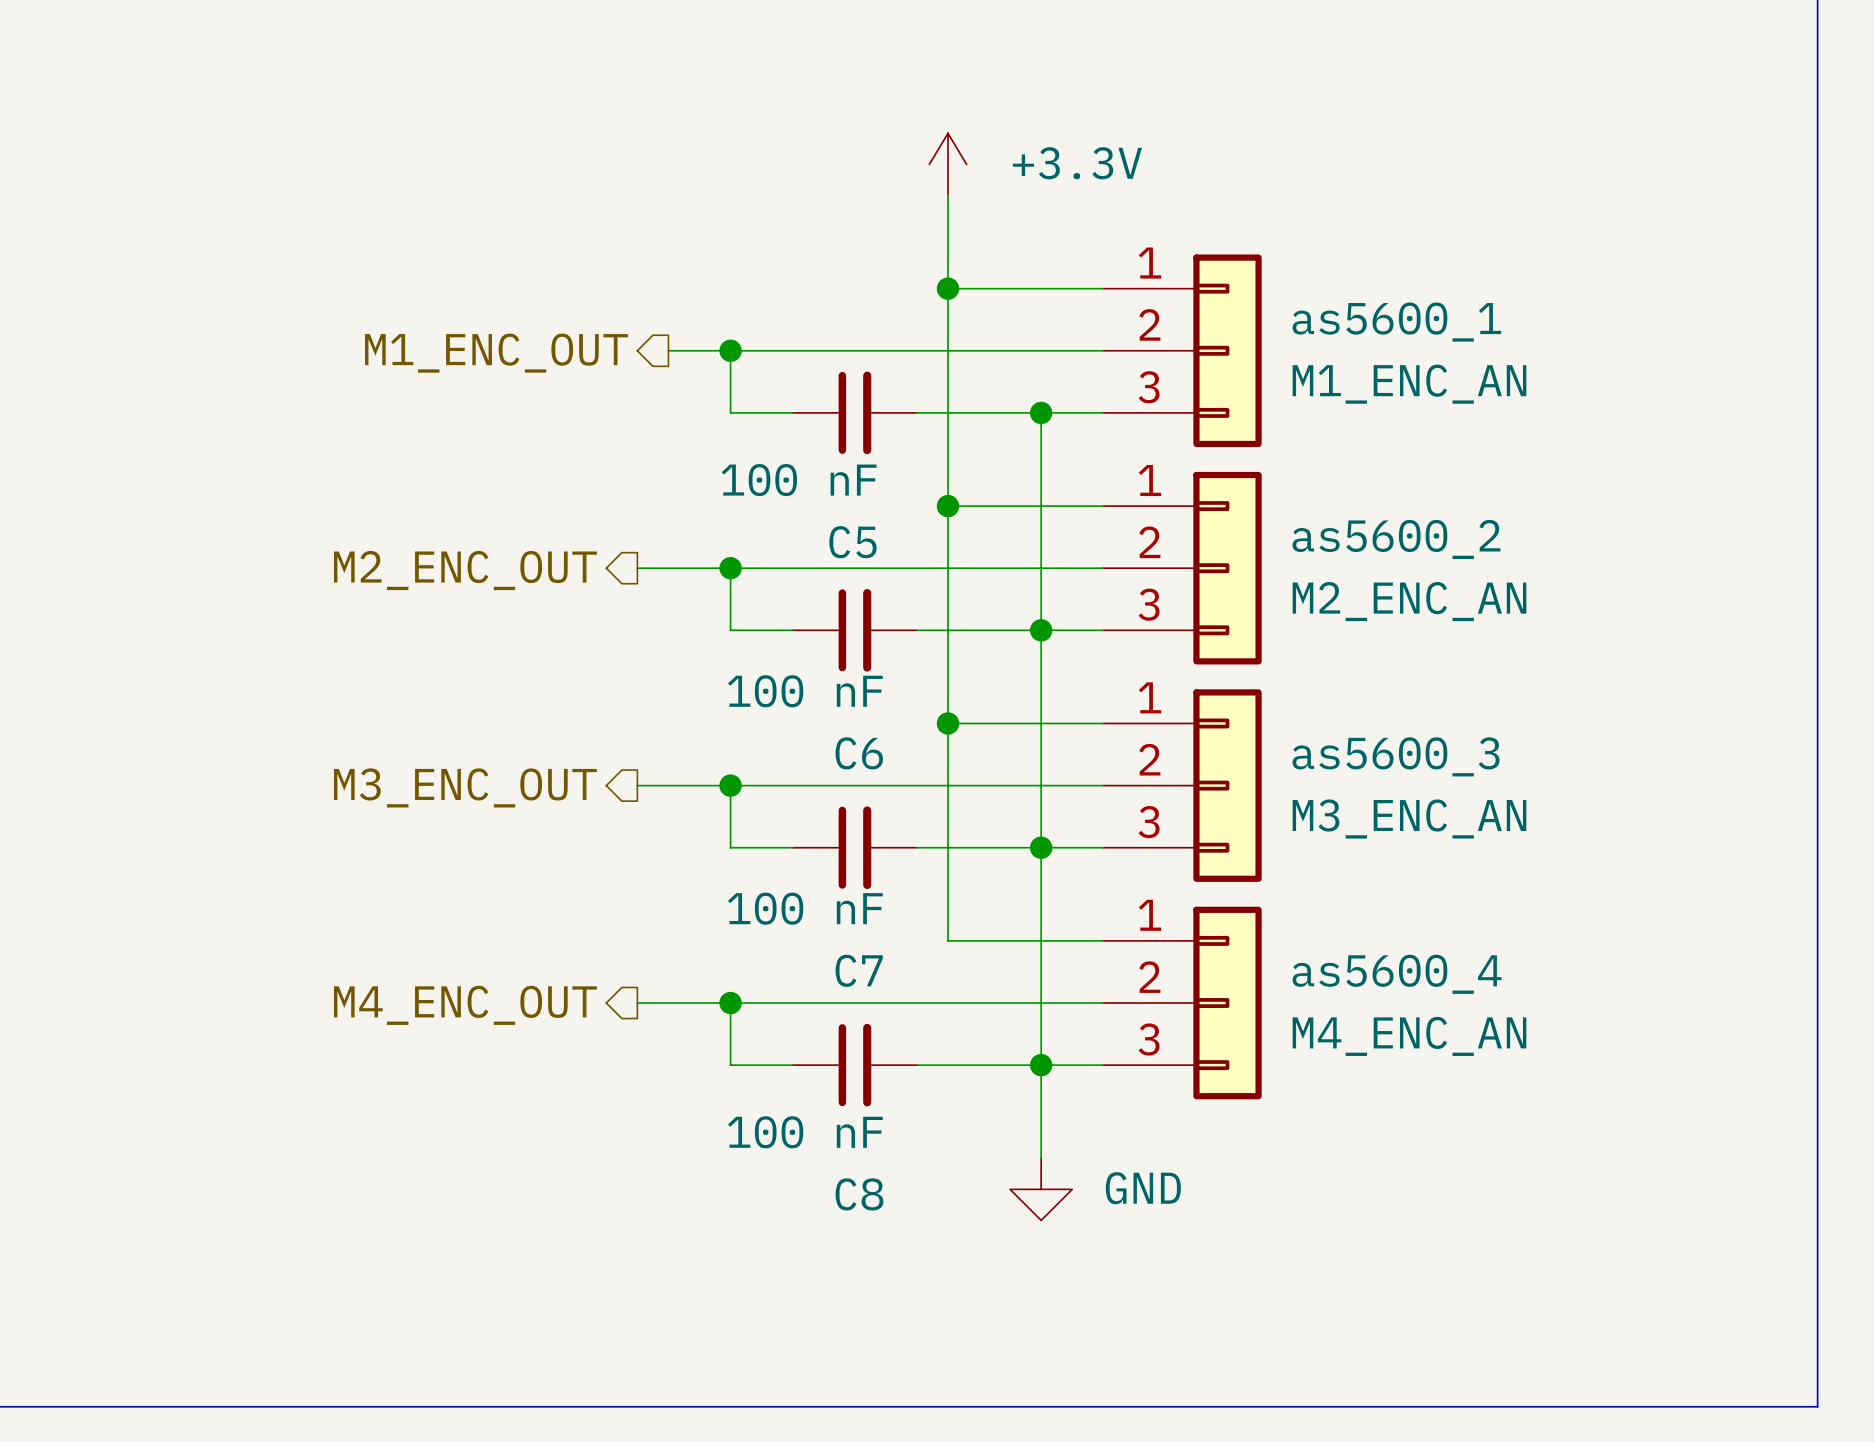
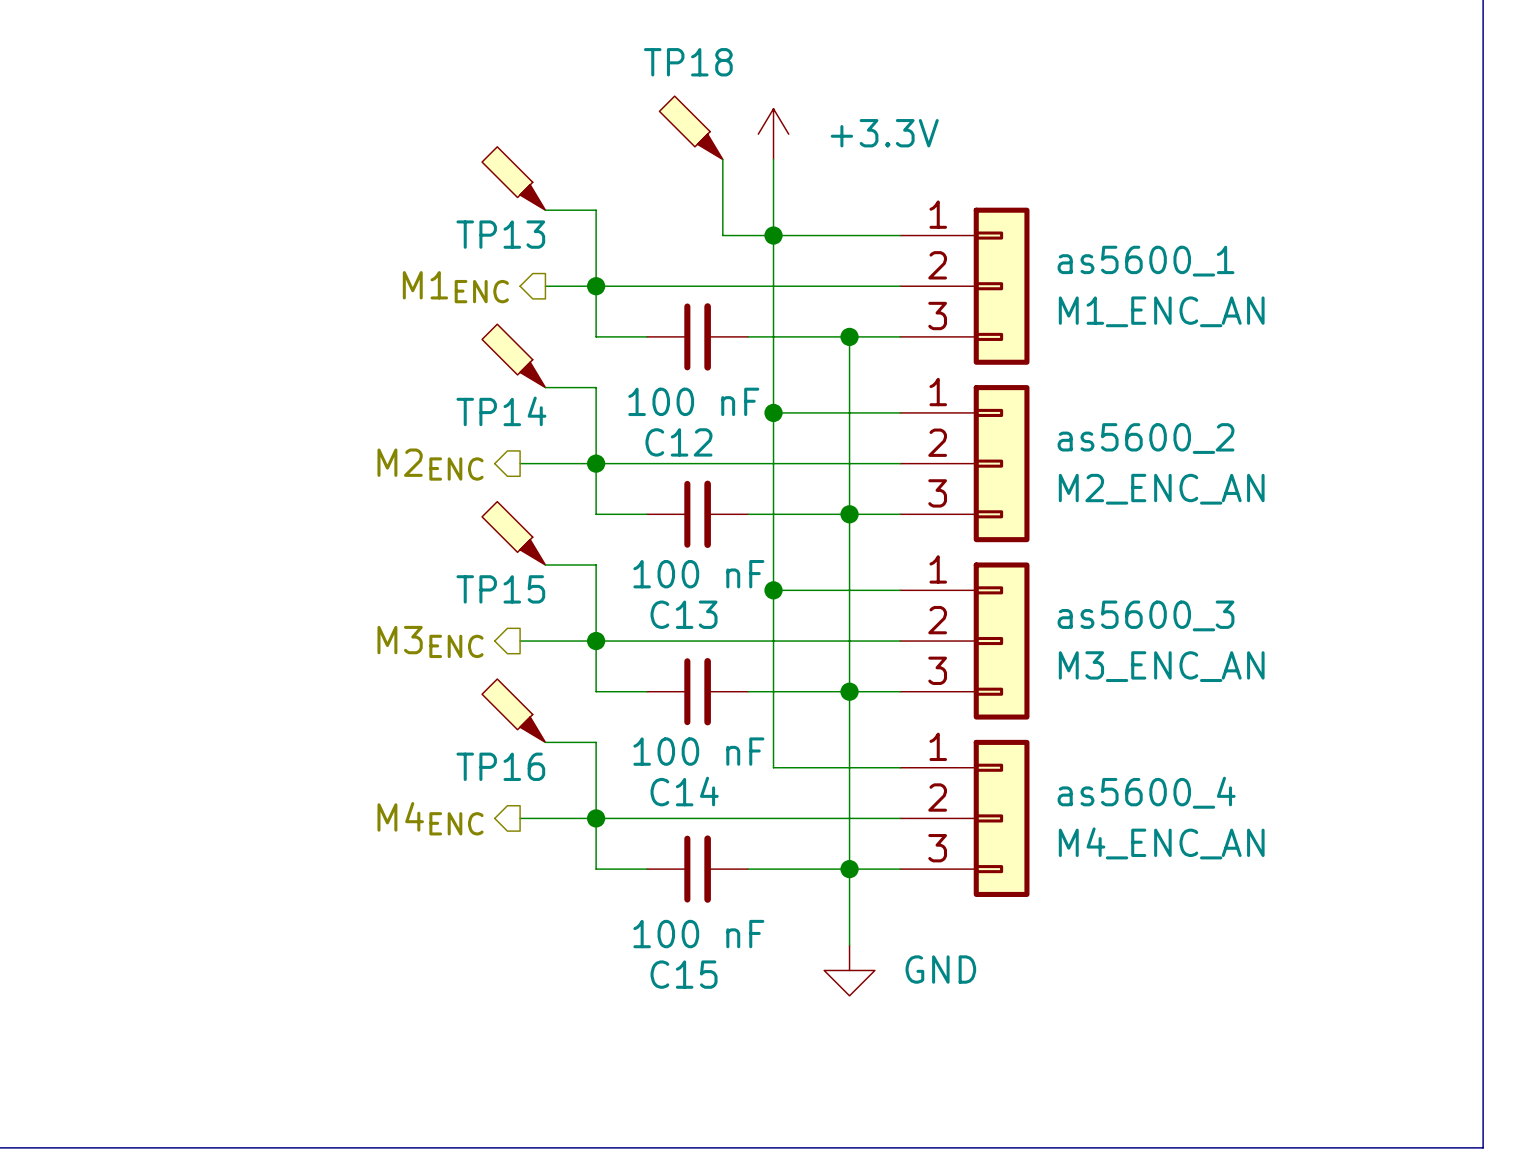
TP18: none -> (691, 127)
wire: none -> (722, 159) (722, 235) (773, 235)
TP13: none -> (513, 178)
wire: none -> (545, 210) (596, 210) (596, 286)
hierarchical label: M1_ENC_OUT (496, 353) -> M1ENC (455, 287)
TP14: none -> (513, 355)
wire: none -> (545, 387) (596, 387) (596, 463)
C5 value position: 100 nF (799, 480) -> 100 nF (693, 401)
C5 name: C5 (853, 542) -> C12 (678, 442)
hierarchical label: M2_ENC_OUT (465, 570) -> M2ENC (430, 464)
TP15: none -> (513, 533)
C6 value position: 100 nF (805, 691) -> 100 nF (698, 574)
wire: none -> (545, 564) (596, 564) (596, 641)
C6 name: C6 (859, 753) -> C13 (684, 614)
hierarchical label: M3_ENC_OUT (465, 787) -> M3ENC (430, 641)
TP16: none -> (513, 710)
C7 value position: 100 nF (805, 908) -> 100 nF (698, 751)
wire: none -> (545, 742) (596, 742) (596, 818)
C7 name: C7 (859, 970) -> C14 (684, 791)
hierarchical label: M4_ENC_OUT (465, 1005) -> M4ENC (430, 818)
C8 value position: 100 nF (805, 1132) -> 100 nF (698, 934)
C8 name: C8 (859, 1194) -> C15 (684, 974)

